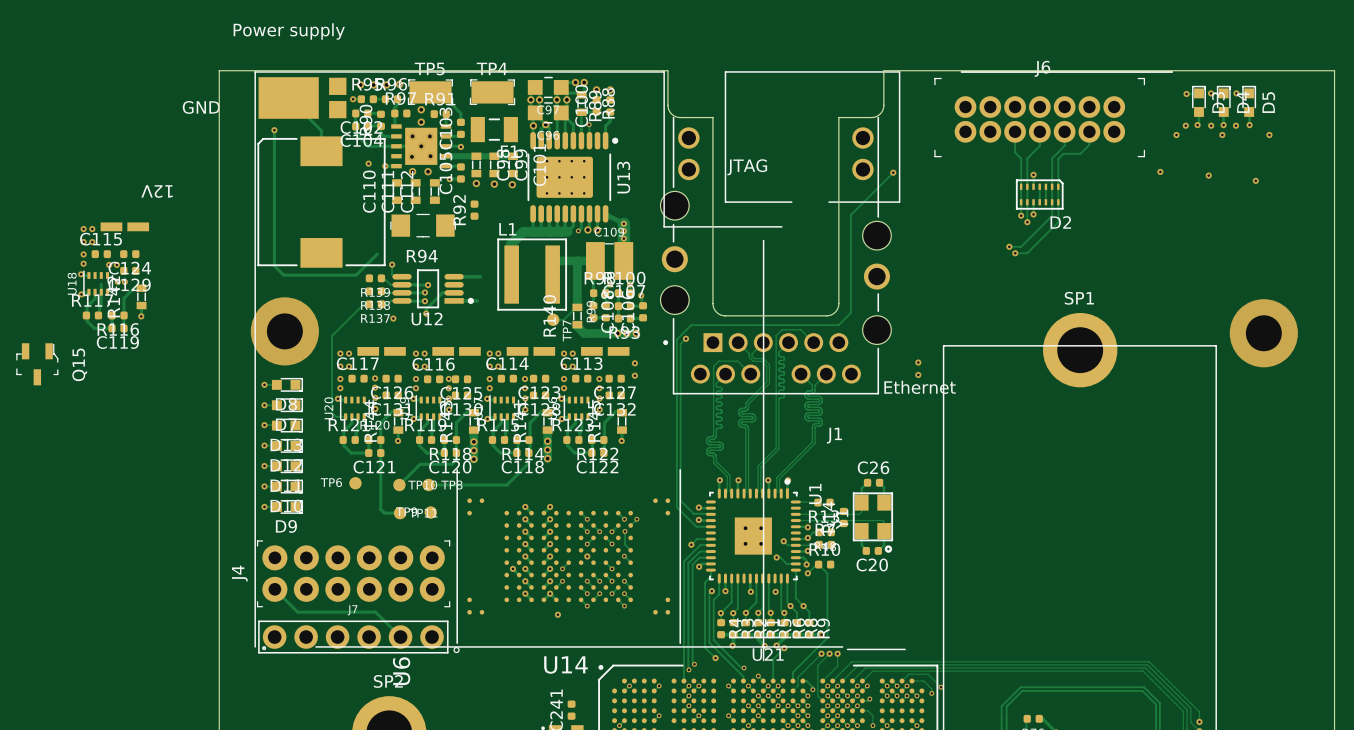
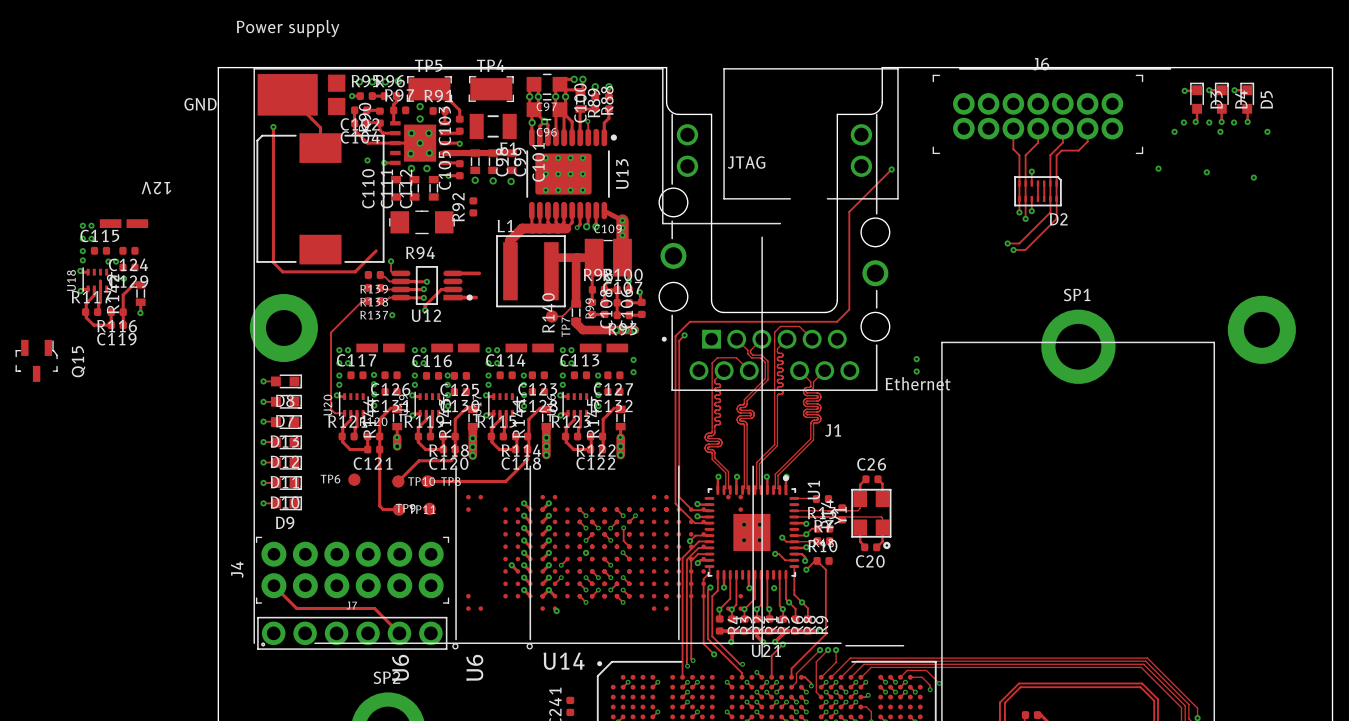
track: none -> (397, 437) (397, 446)
track: none -> (620, 437) (620, 455)
via: none -> (397, 446)
via: none -> (620, 446)
via: none -> (620, 455)
U6: none -> (640, 557)

